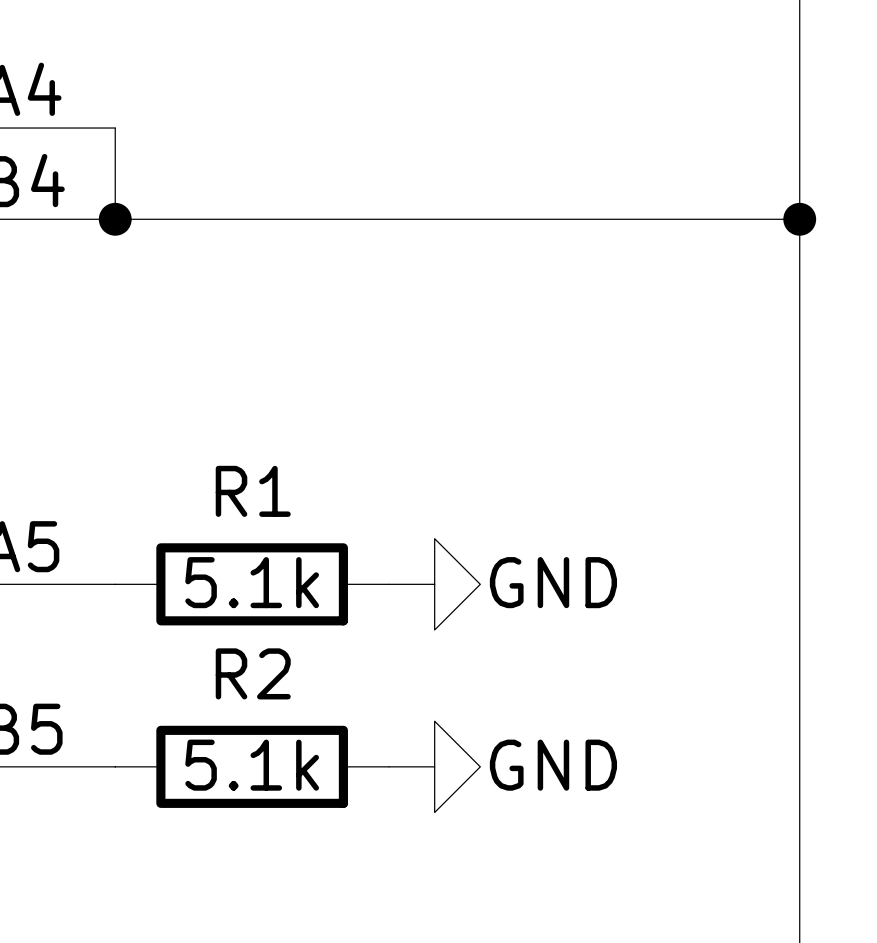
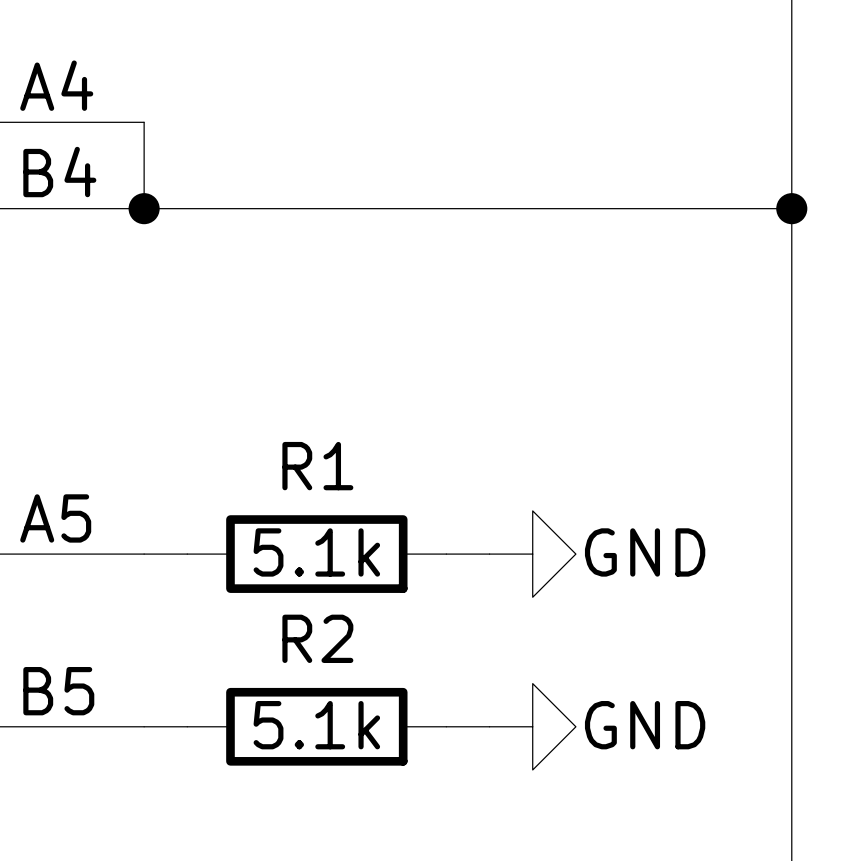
R1 position: (252, 584) -> (316, 554)
wire: none -> (446, 554) (489, 554)
power symbol position: GND (434, 584) -> GND (532, 554)
R2 position: (252, 766) -> (316, 726)
wire: none -> (446, 726) (489, 726)
power symbol position: GND (434, 766) -> GND (532, 726)

